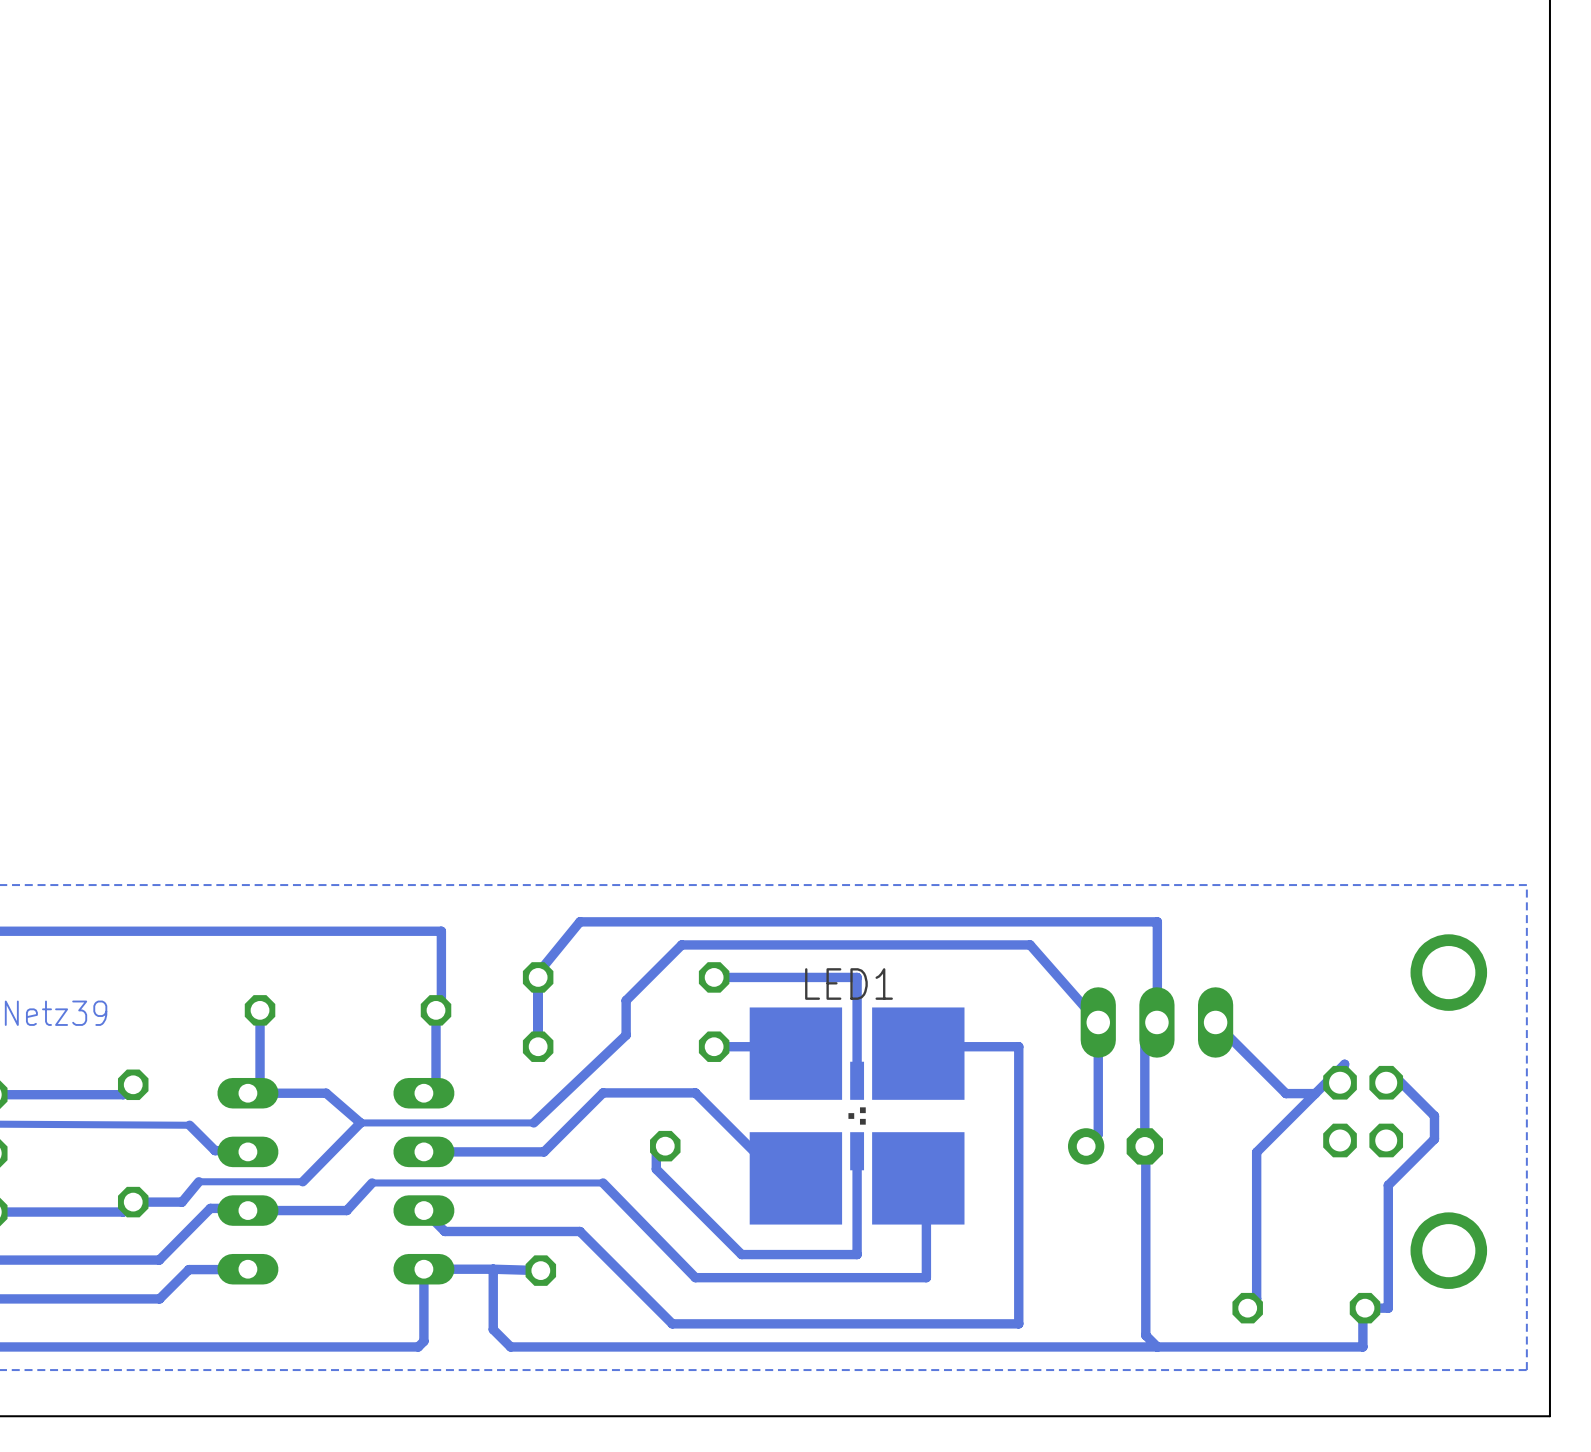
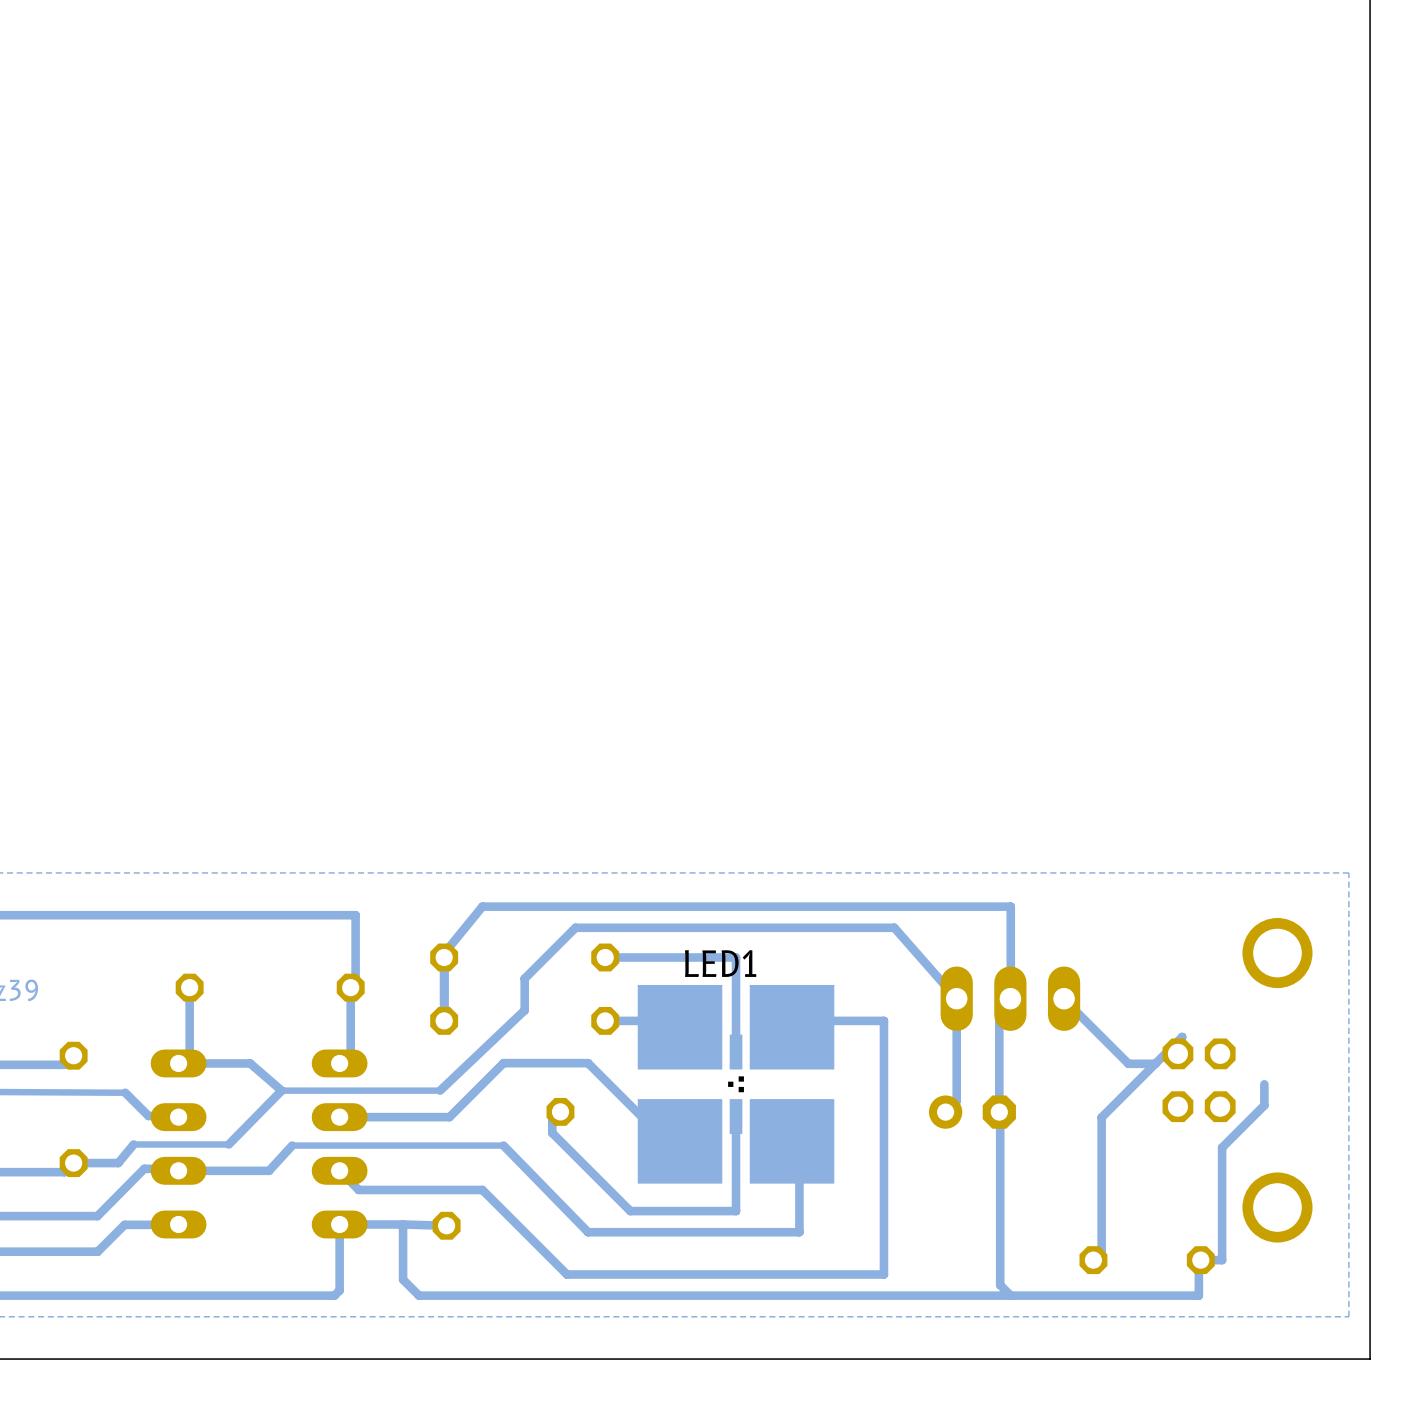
bottom track: (1386, 1082) (1393, 1074) (1434, 1116) -> none

